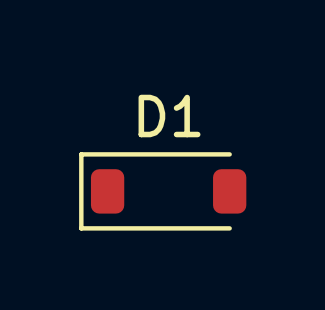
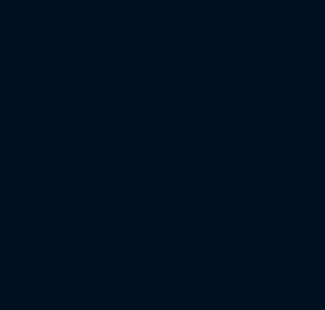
D1: (162, 191) -> none

